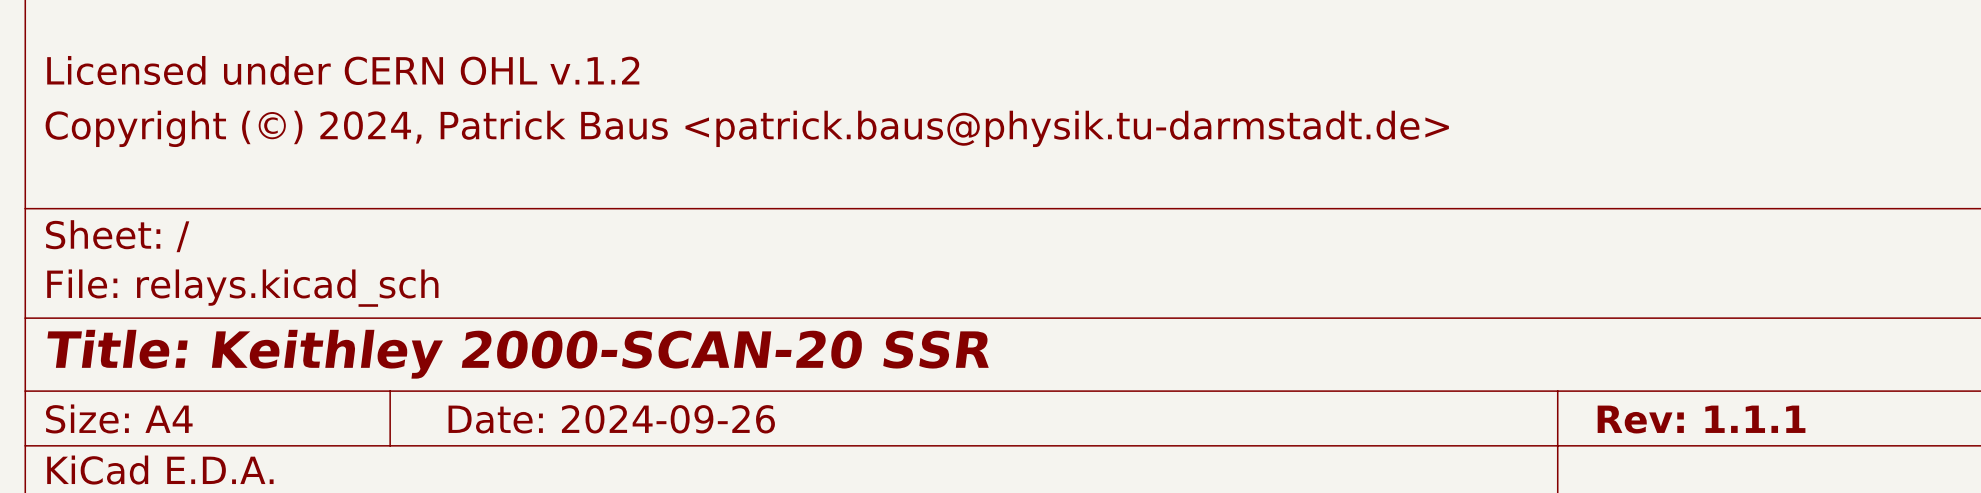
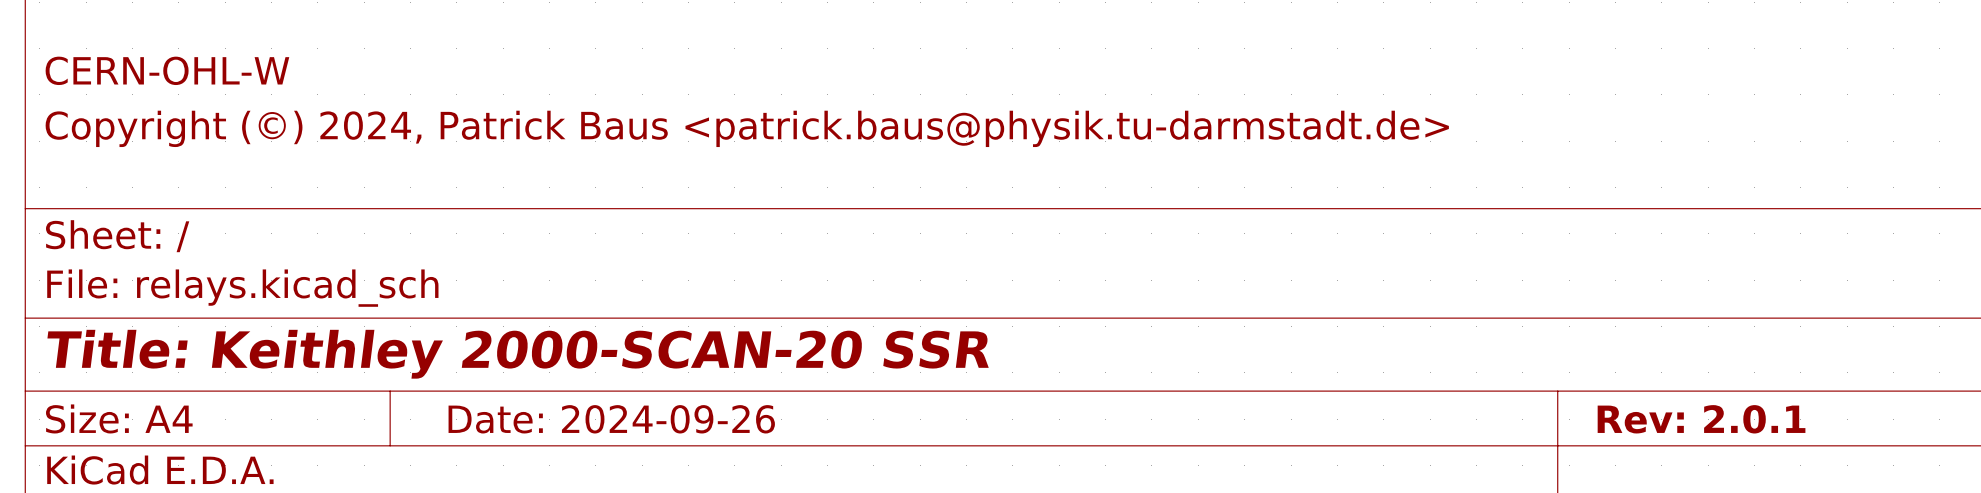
title block: Licensed under CERN OHL v.1.2 (343, 70) -> CERN-OHL-W (167, 70)
title block: Rev: 1.1.1 (1701, 419) -> Rev: 2.0.1 (1701, 419)

